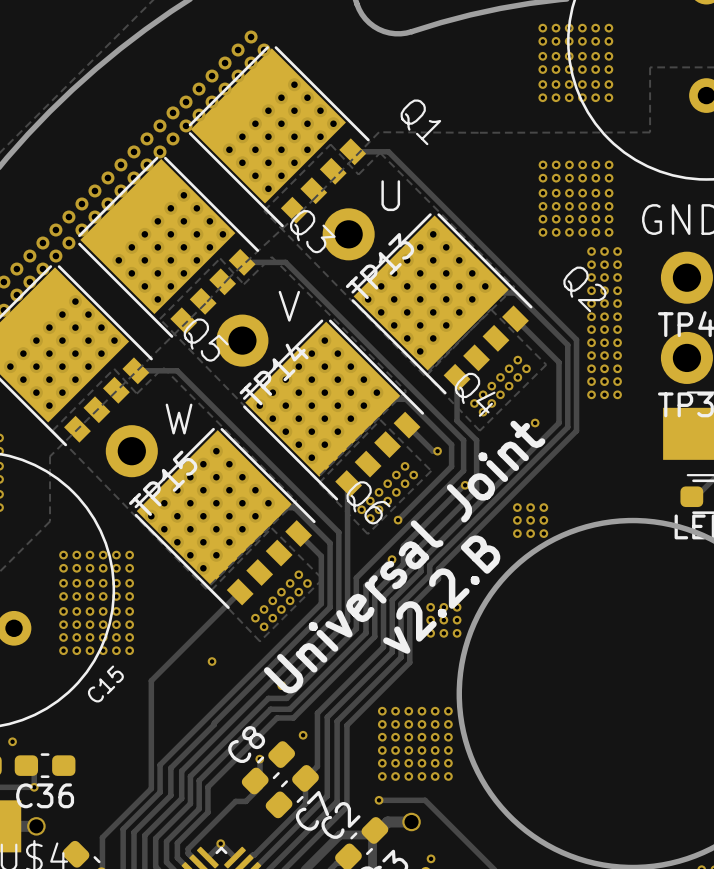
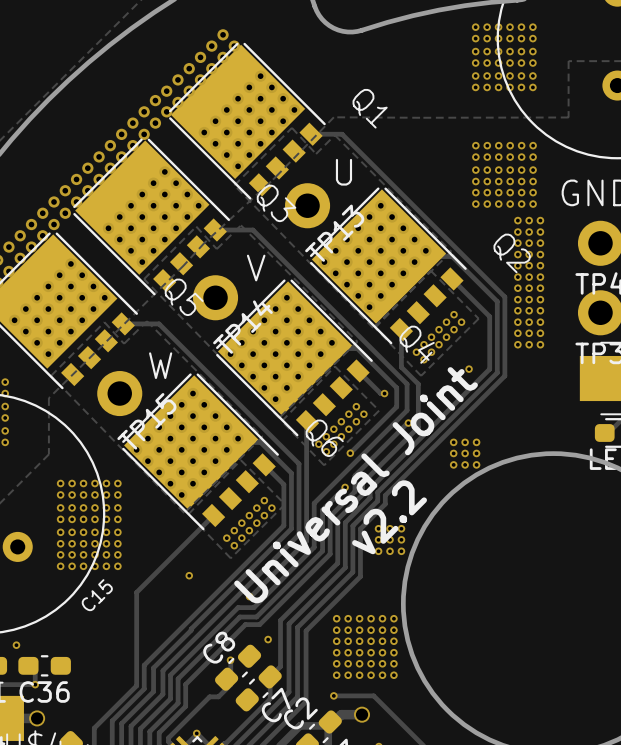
text: v2.2.B (441, 594) -> v2.2 (389, 517)

